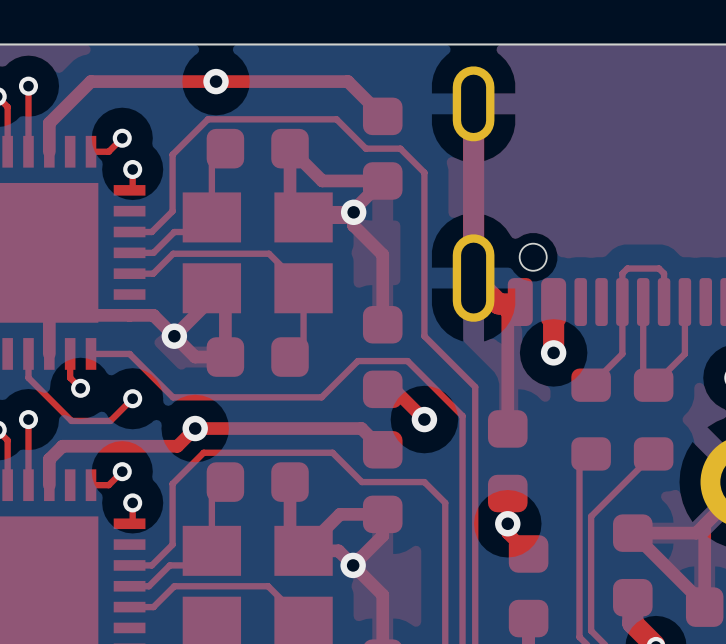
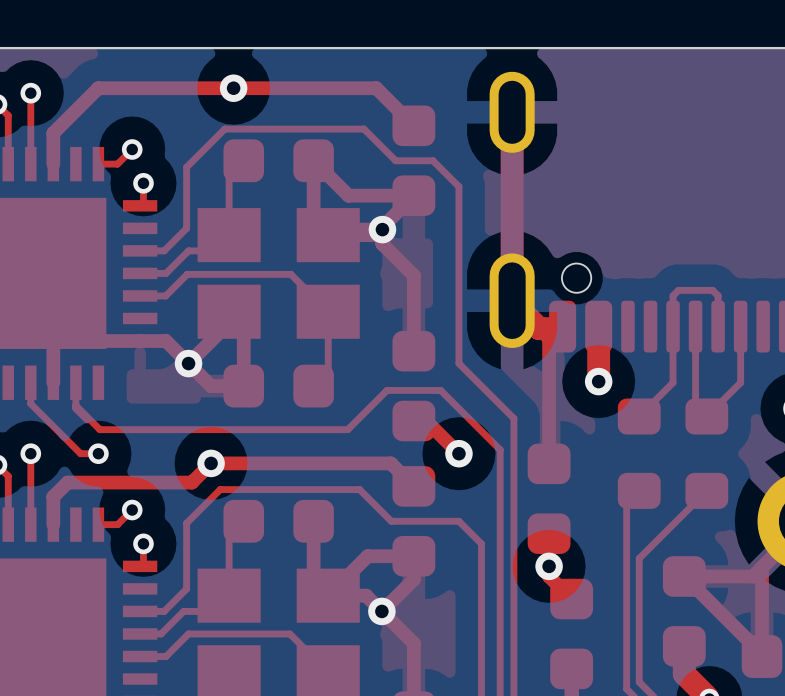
top track: (91, 353) (129, 353) (172, 397) -> (75, 405) (99, 429) (187, 429)
top track: (28, 373) (28, 377) (71, 420) (110, 420) (132, 398) -> (30, 403) (80, 453) (98, 453)
via: (80, 388) -> none
via: (132, 398) -> none
via: none -> (98, 453)

